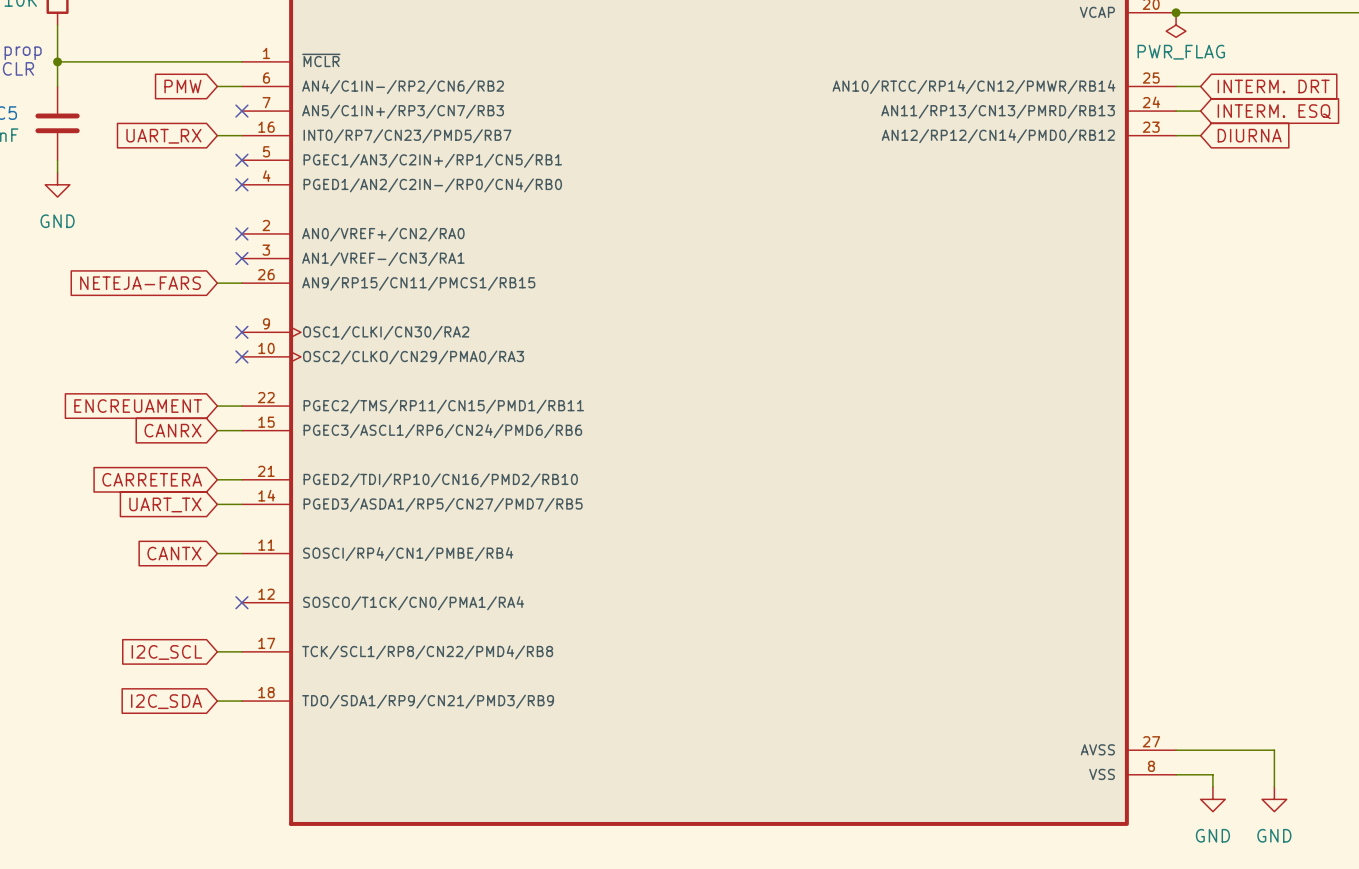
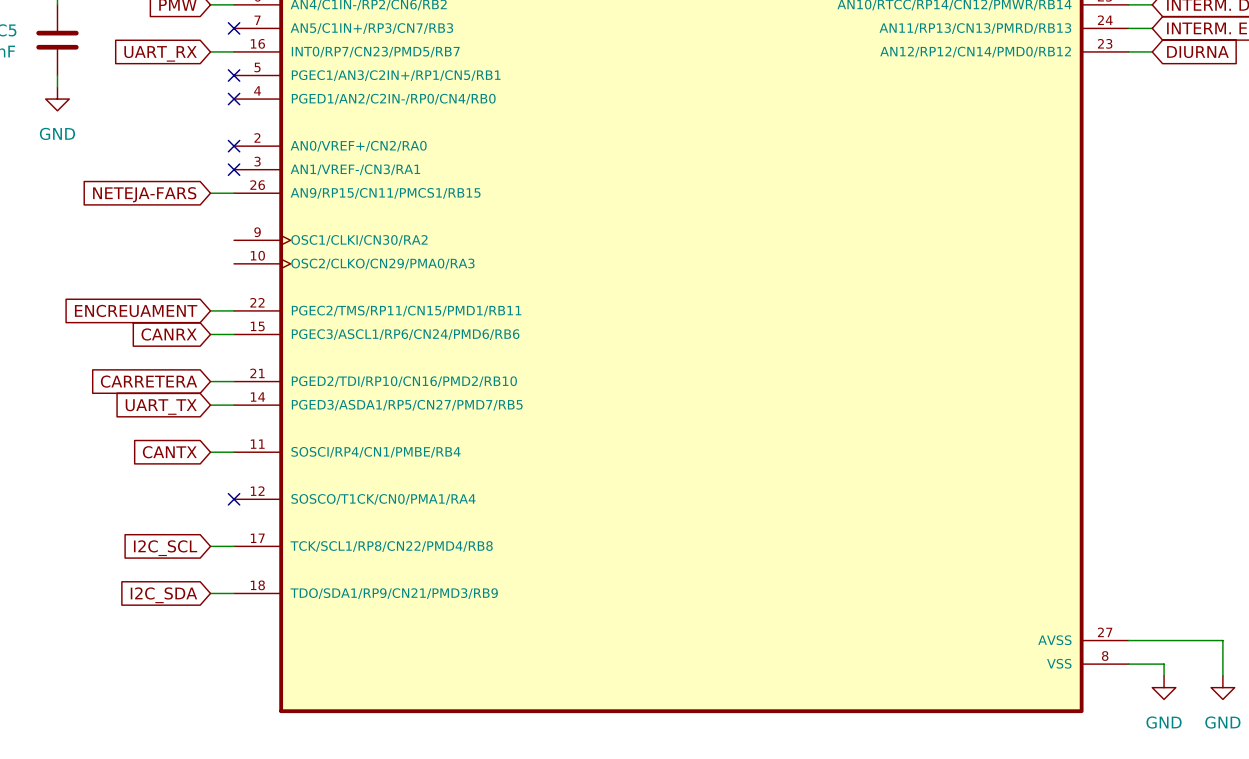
no-connect mark: (241, 332) -> none
no-connect mark: (241, 356) -> none

